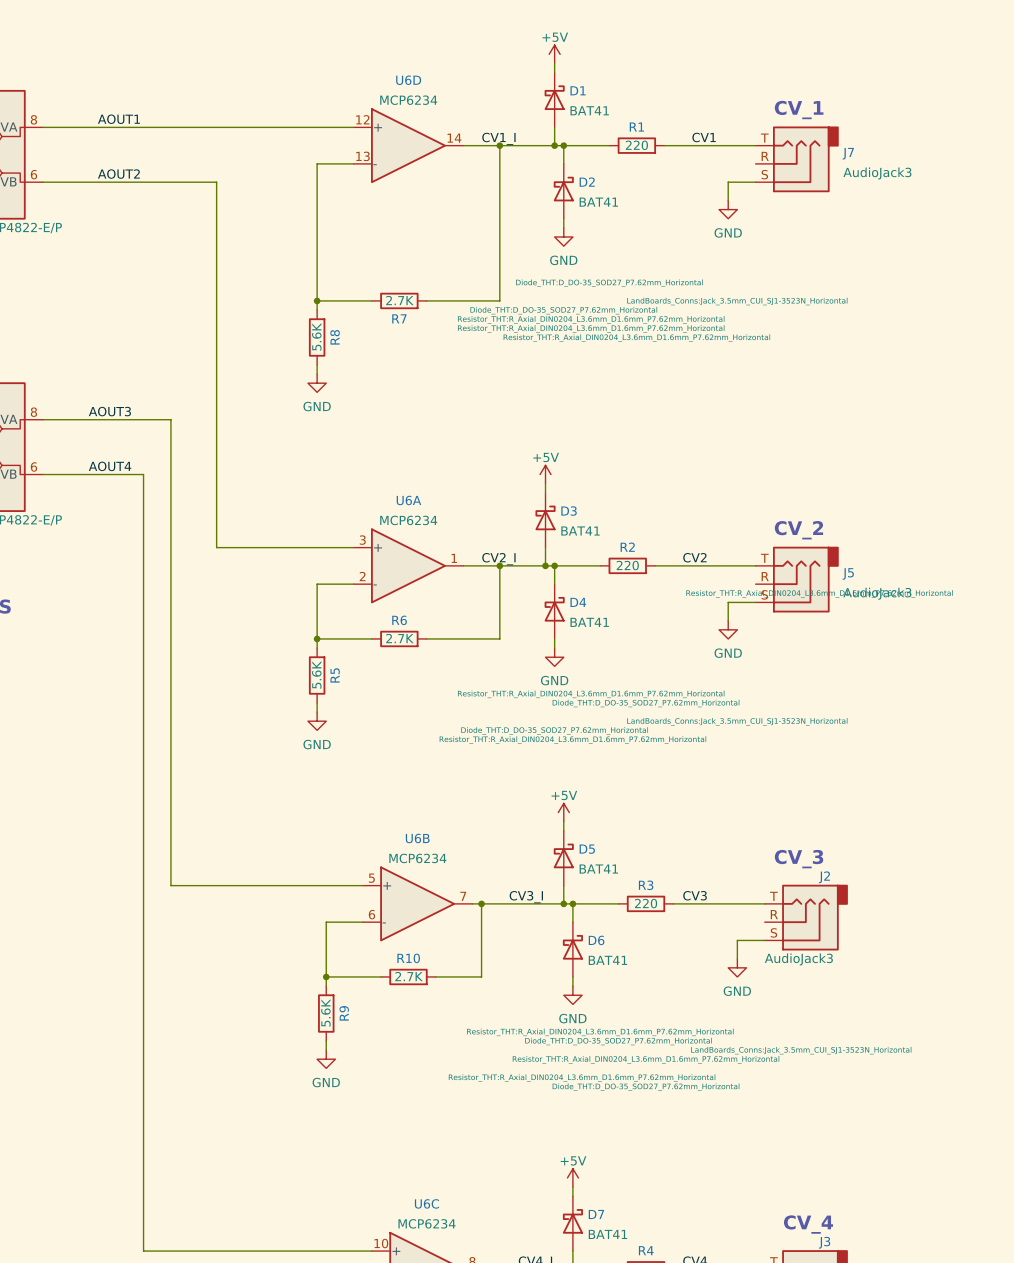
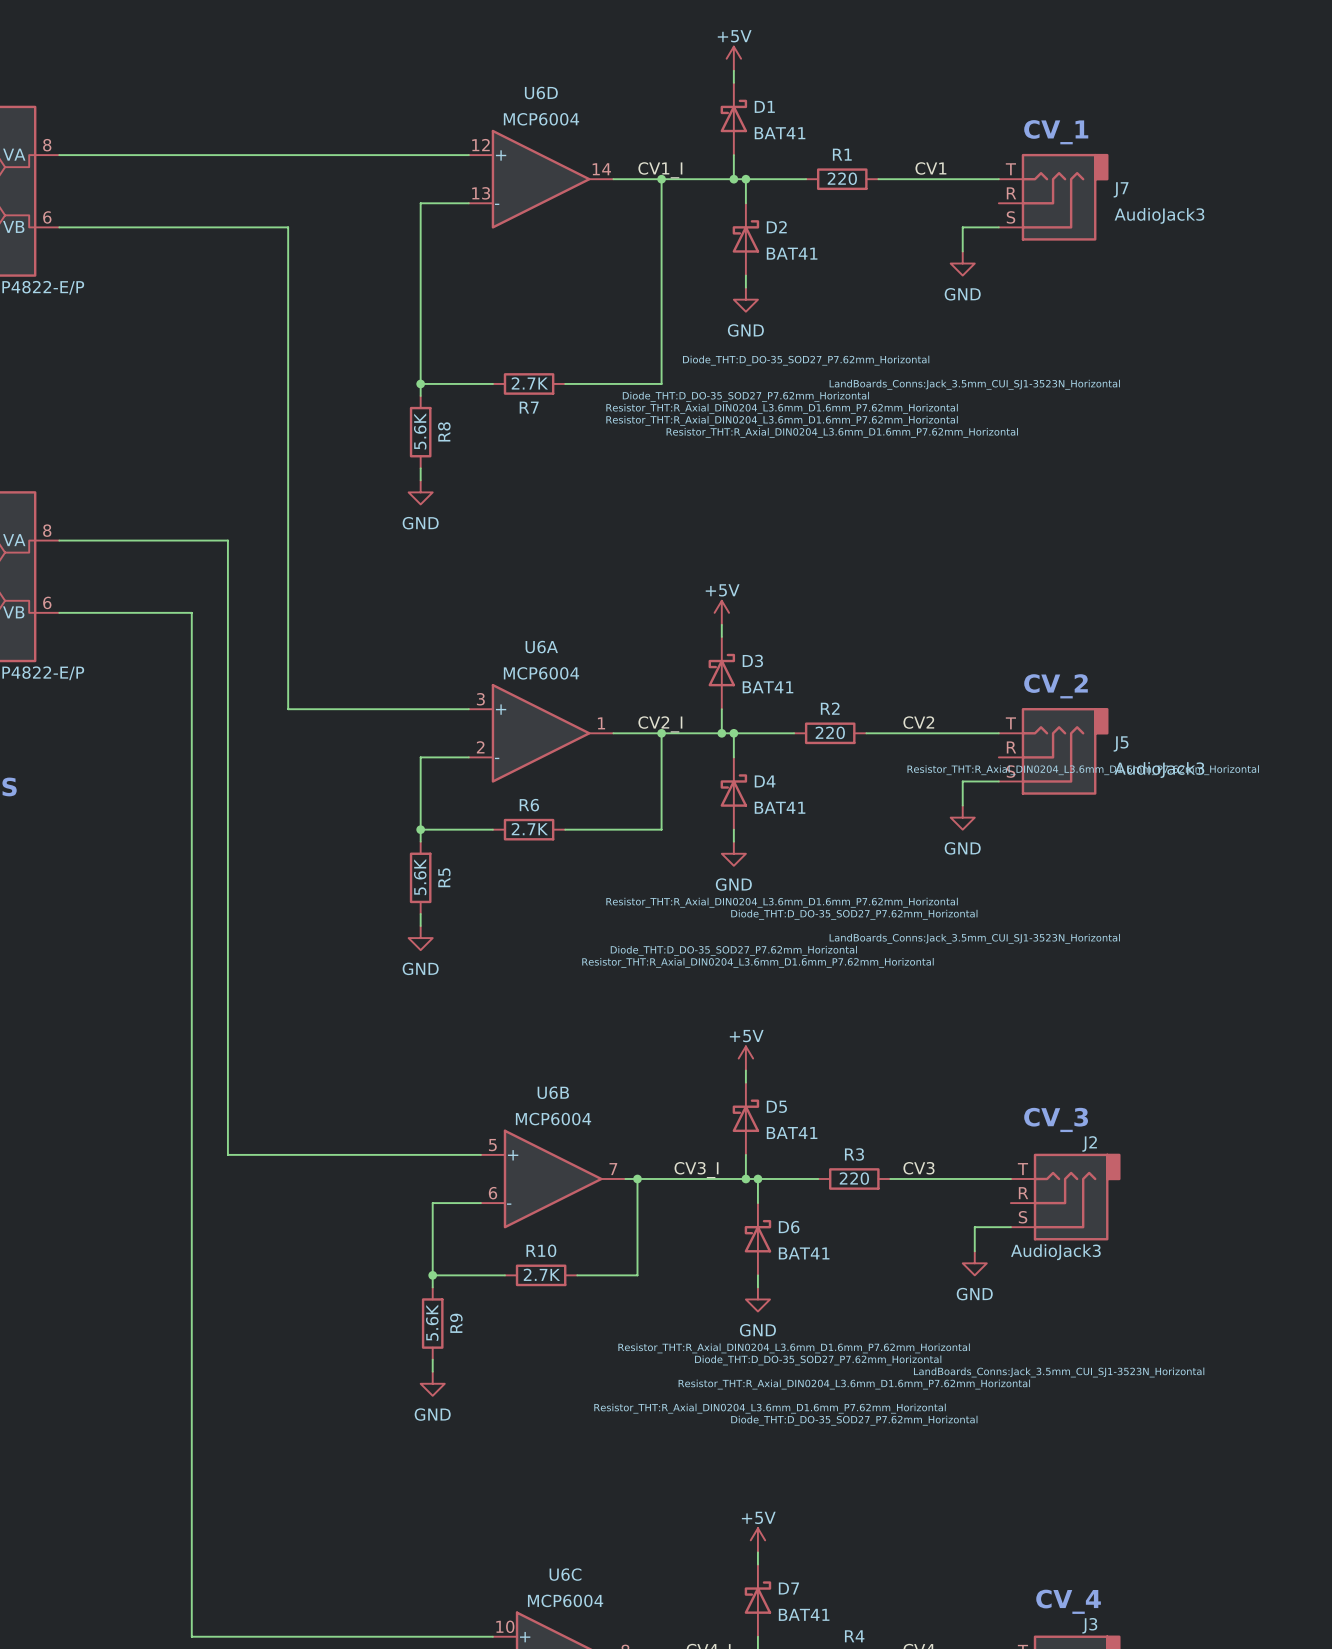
U6D value: MCP6234 (408, 100) -> MCP6004 (541, 119)
label: AOUT1 (118, 119) -> none
label: AOUT2 (118, 174) -> none
label: AOUT3 (109, 411) -> none
label: AOUT4 (110, 466) -> none
U6A value: MCP6234 (408, 520) -> MCP6004 (541, 673)
U6B value: MCP6234 (417, 858) -> MCP6004 (553, 1119)
U6C value: MCP6234 (427, 1223) -> MCP6004 (565, 1600)

